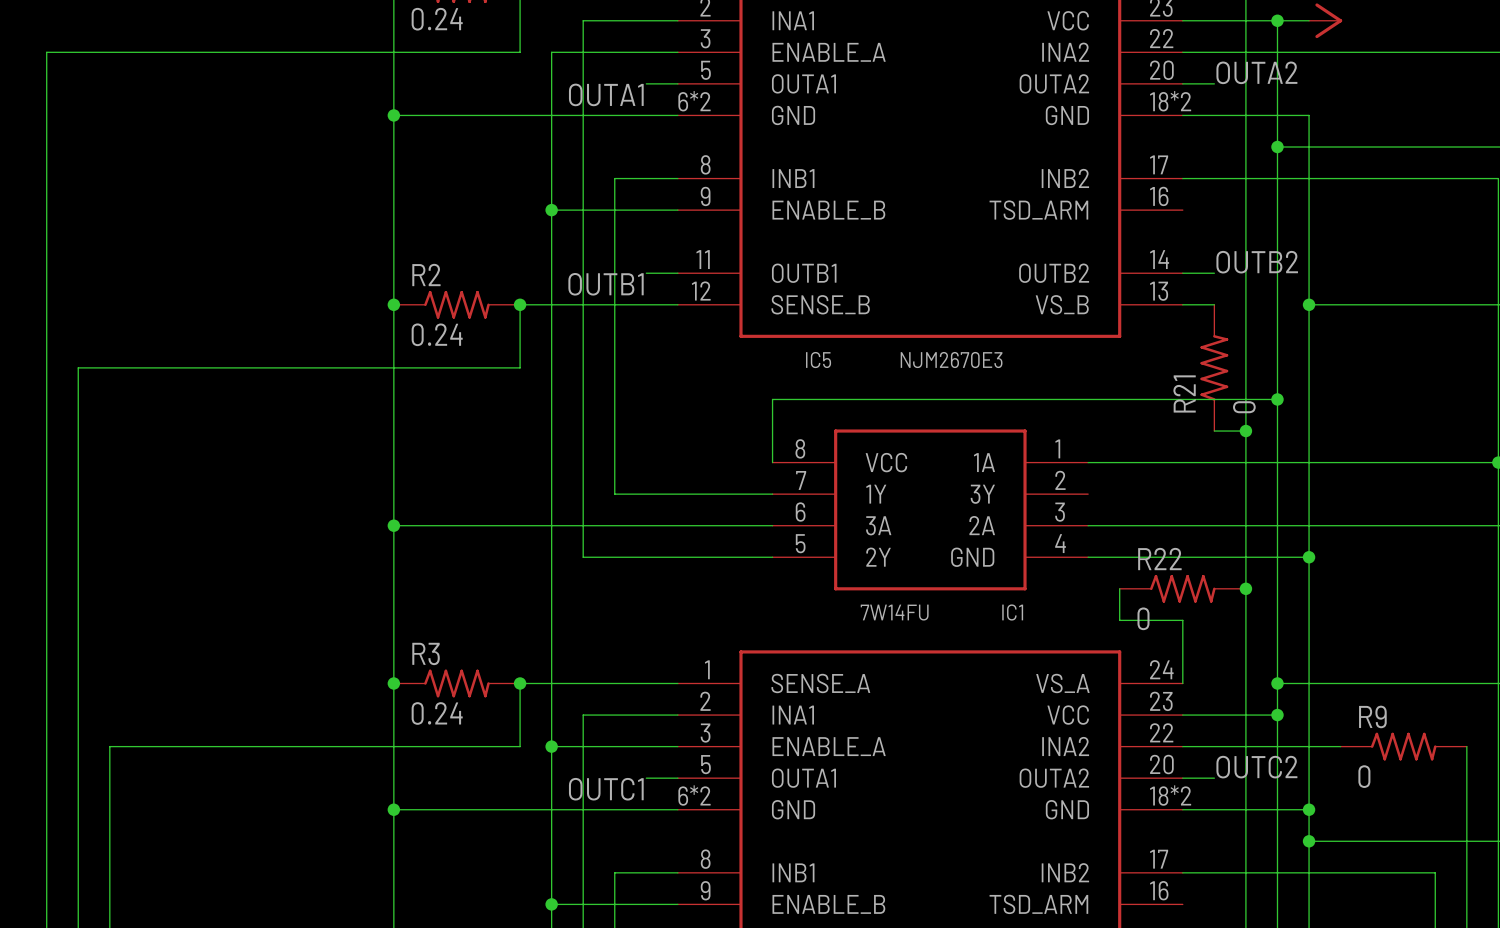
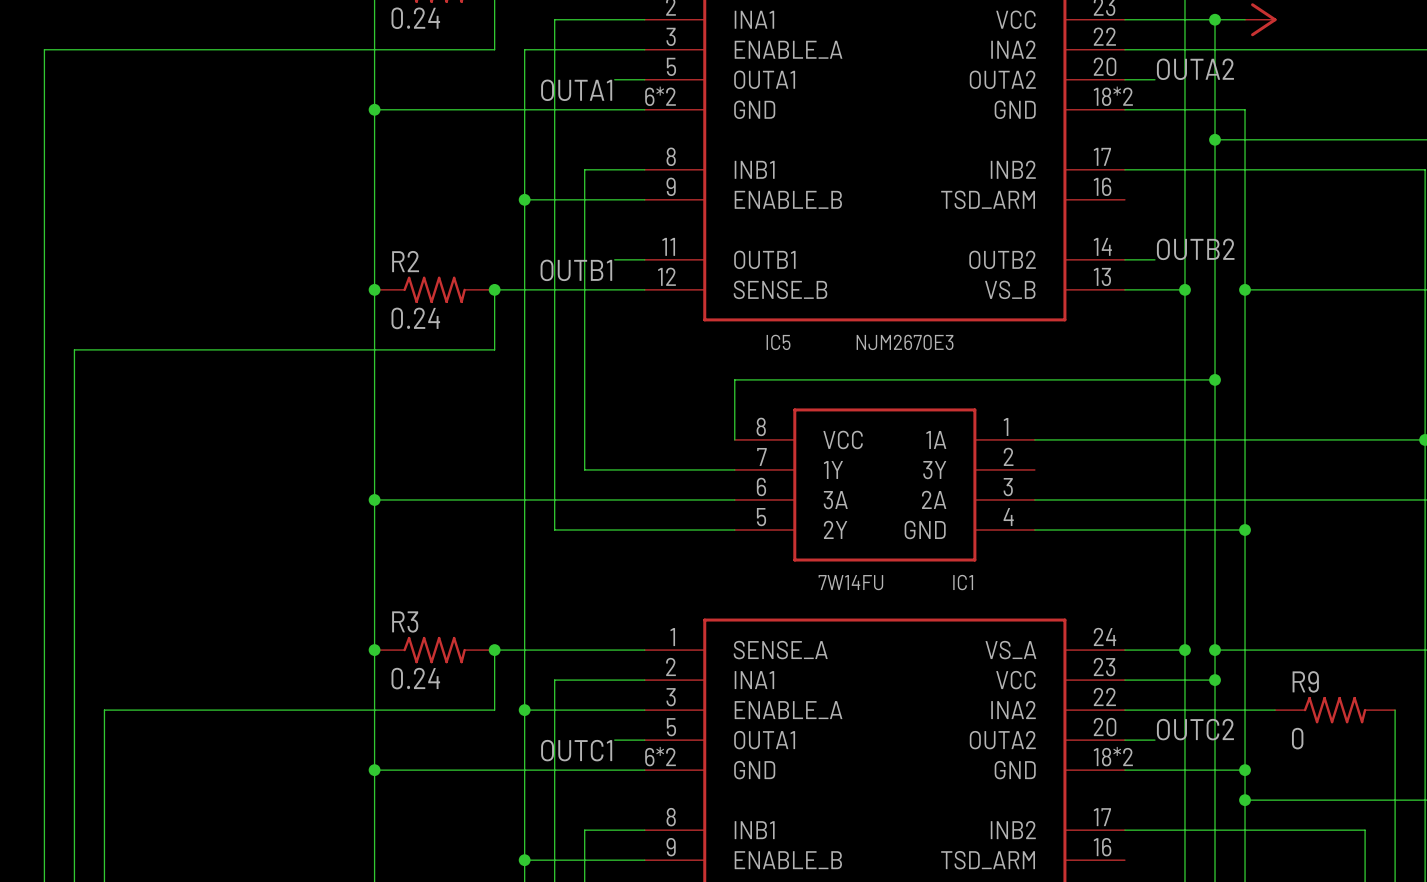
junction: none -> (1184, 289)
R21: 0 (1214, 367) -> none
wire: (1214, 431) (1245, 431) -> (1154, 289) (1184, 289)
junction: (1245, 431) -> none
wire: (1119, 588) (1119, 620) (1182, 620) (1182, 683) -> (1184, 650) (1124, 650)
R22: 0 (1182, 588) -> none
junction: (1245, 588) -> none
junction: none -> (1184, 650)

